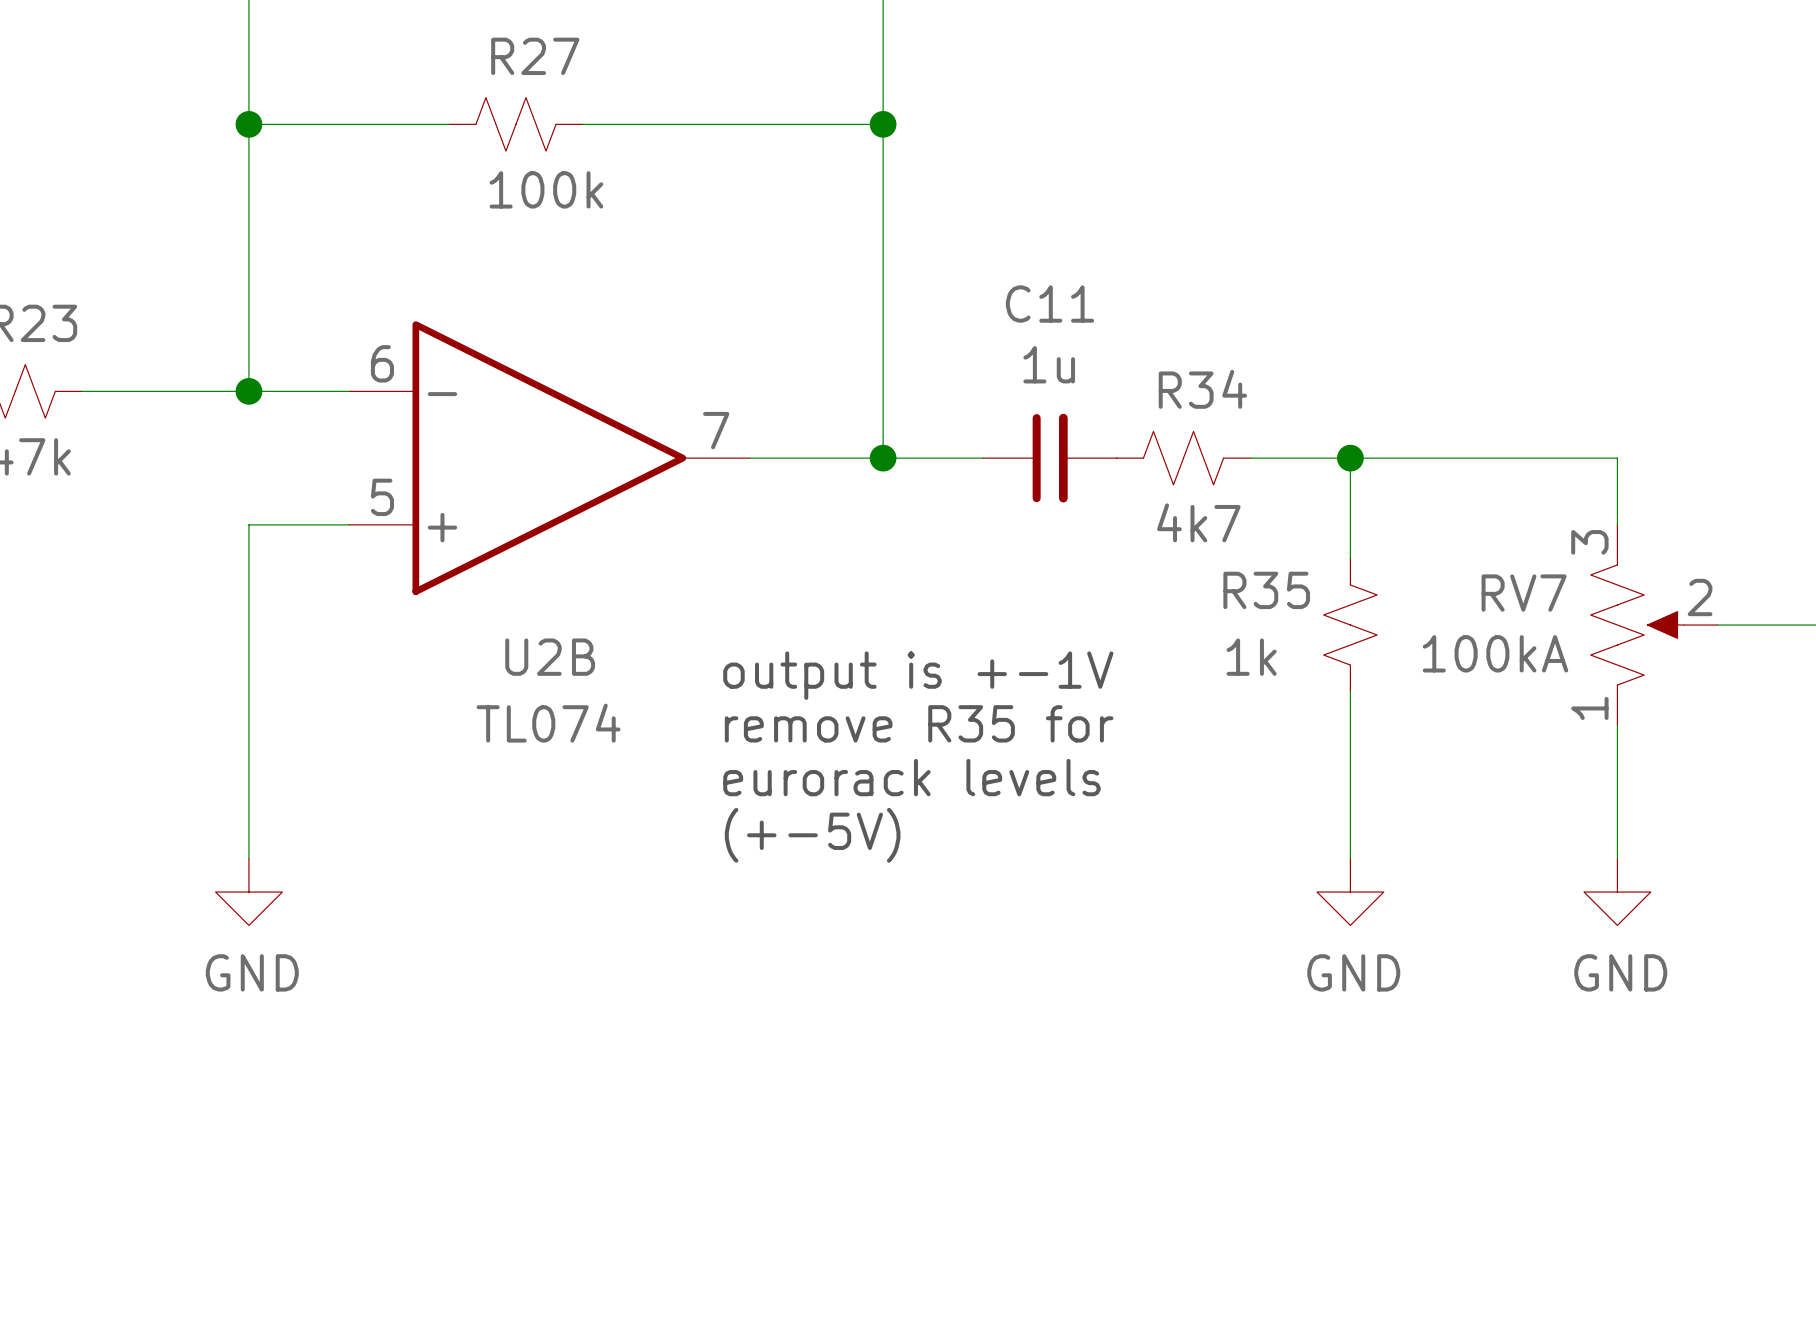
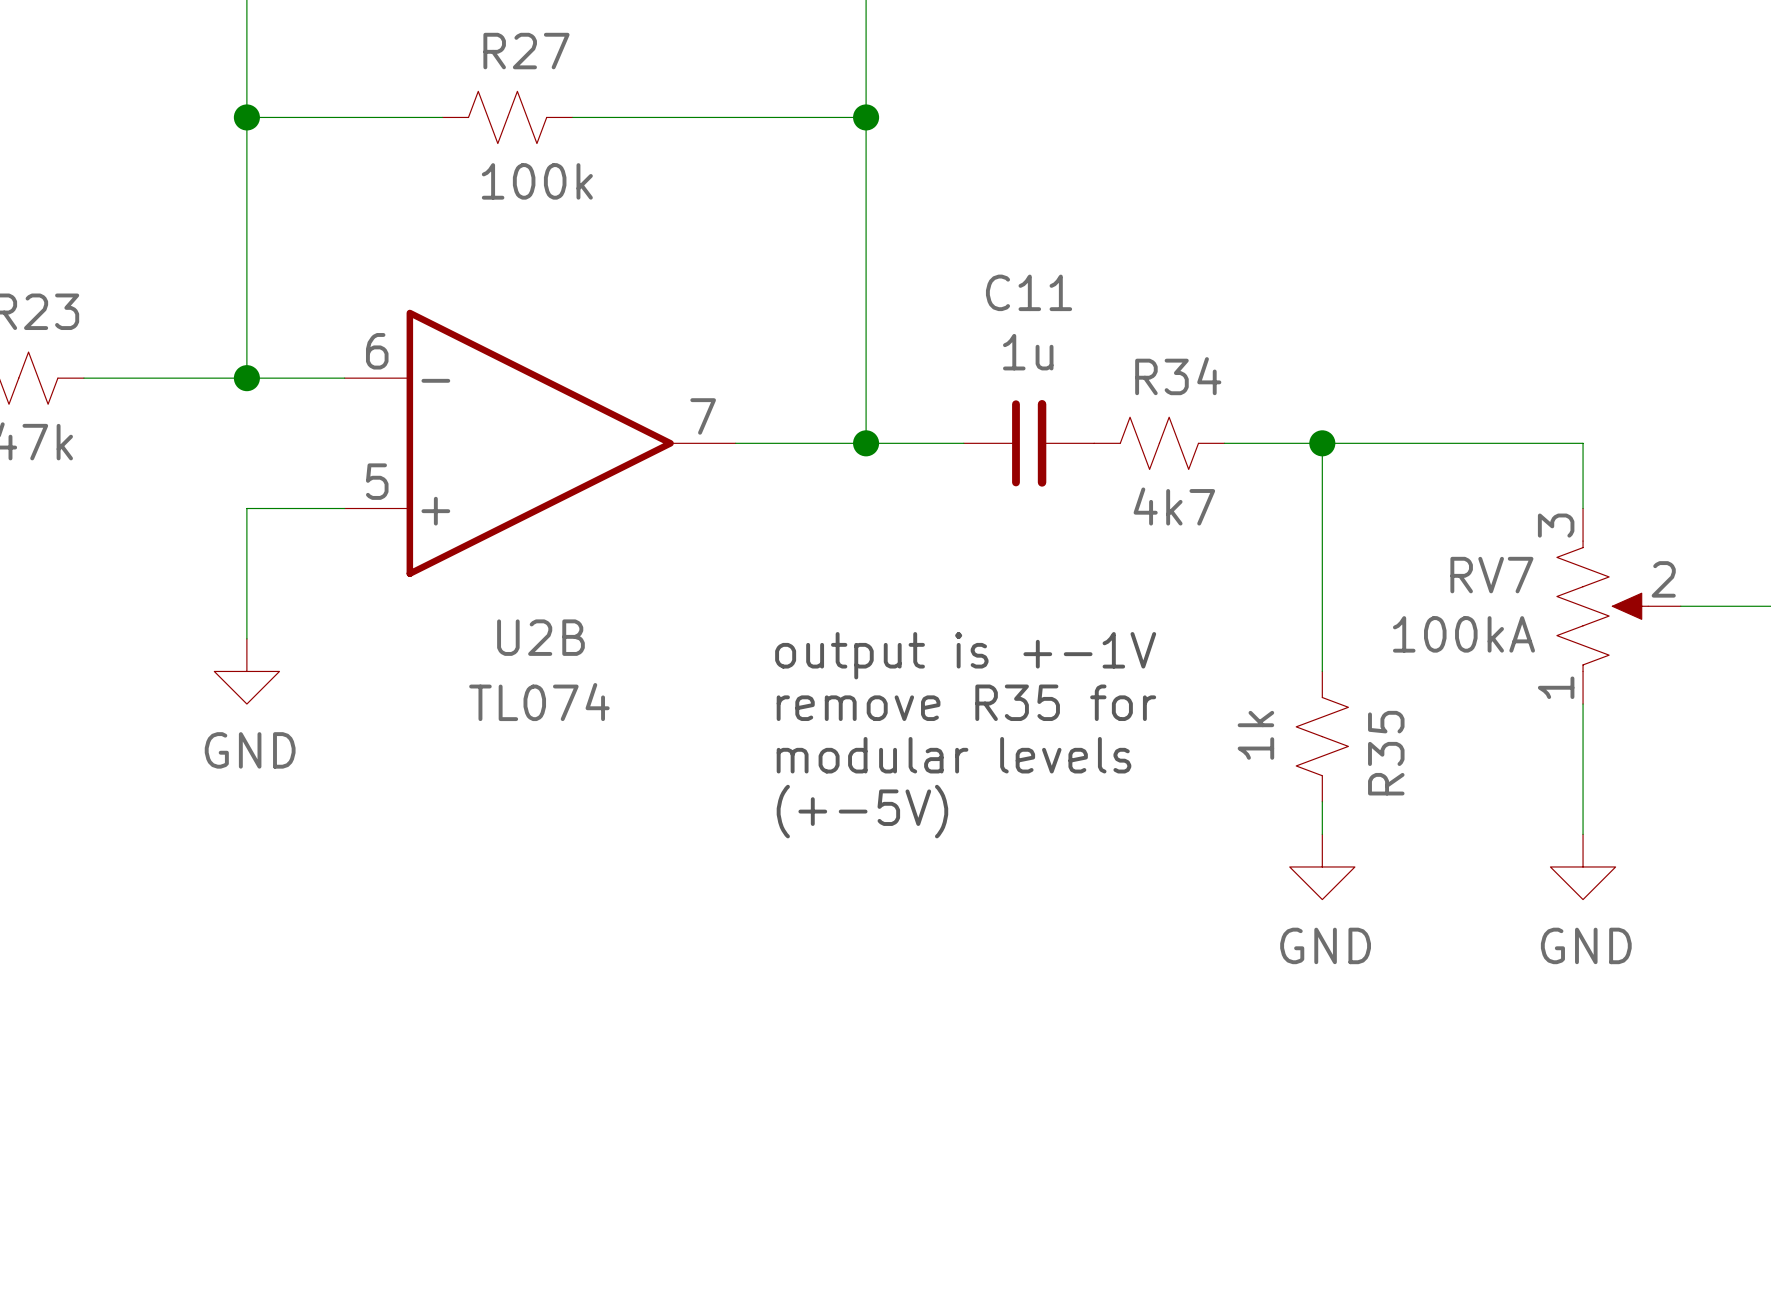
R35 name rotation: 0° (1266, 590) -> 90° counterclockwise (1386, 753)
R35 name position: R35 (1266, 590) -> R35 (1386, 753)
R35 position: (1350, 625) -> (1322, 736)
R35 value rotation: 0° (1251, 657) -> 90° counterclockwise (1255, 735)
wire: (248, 658) (248, 858) -> none
text position: output is +-1V (918, 675) -> output is +-1V (965, 655)
wire: (1350, 691) (1350, 825) -> (1322, 671) (1322, 541)
text position: remove R35 for (919, 723) -> remove R35 for (966, 702)
text: eurorack levels (911, 777) -> modular levels (954, 755)
text position: (+-5V) (812, 835) -> (+-5V) (862, 811)
power symbol position: GND (248, 892) -> GND (246, 671)

